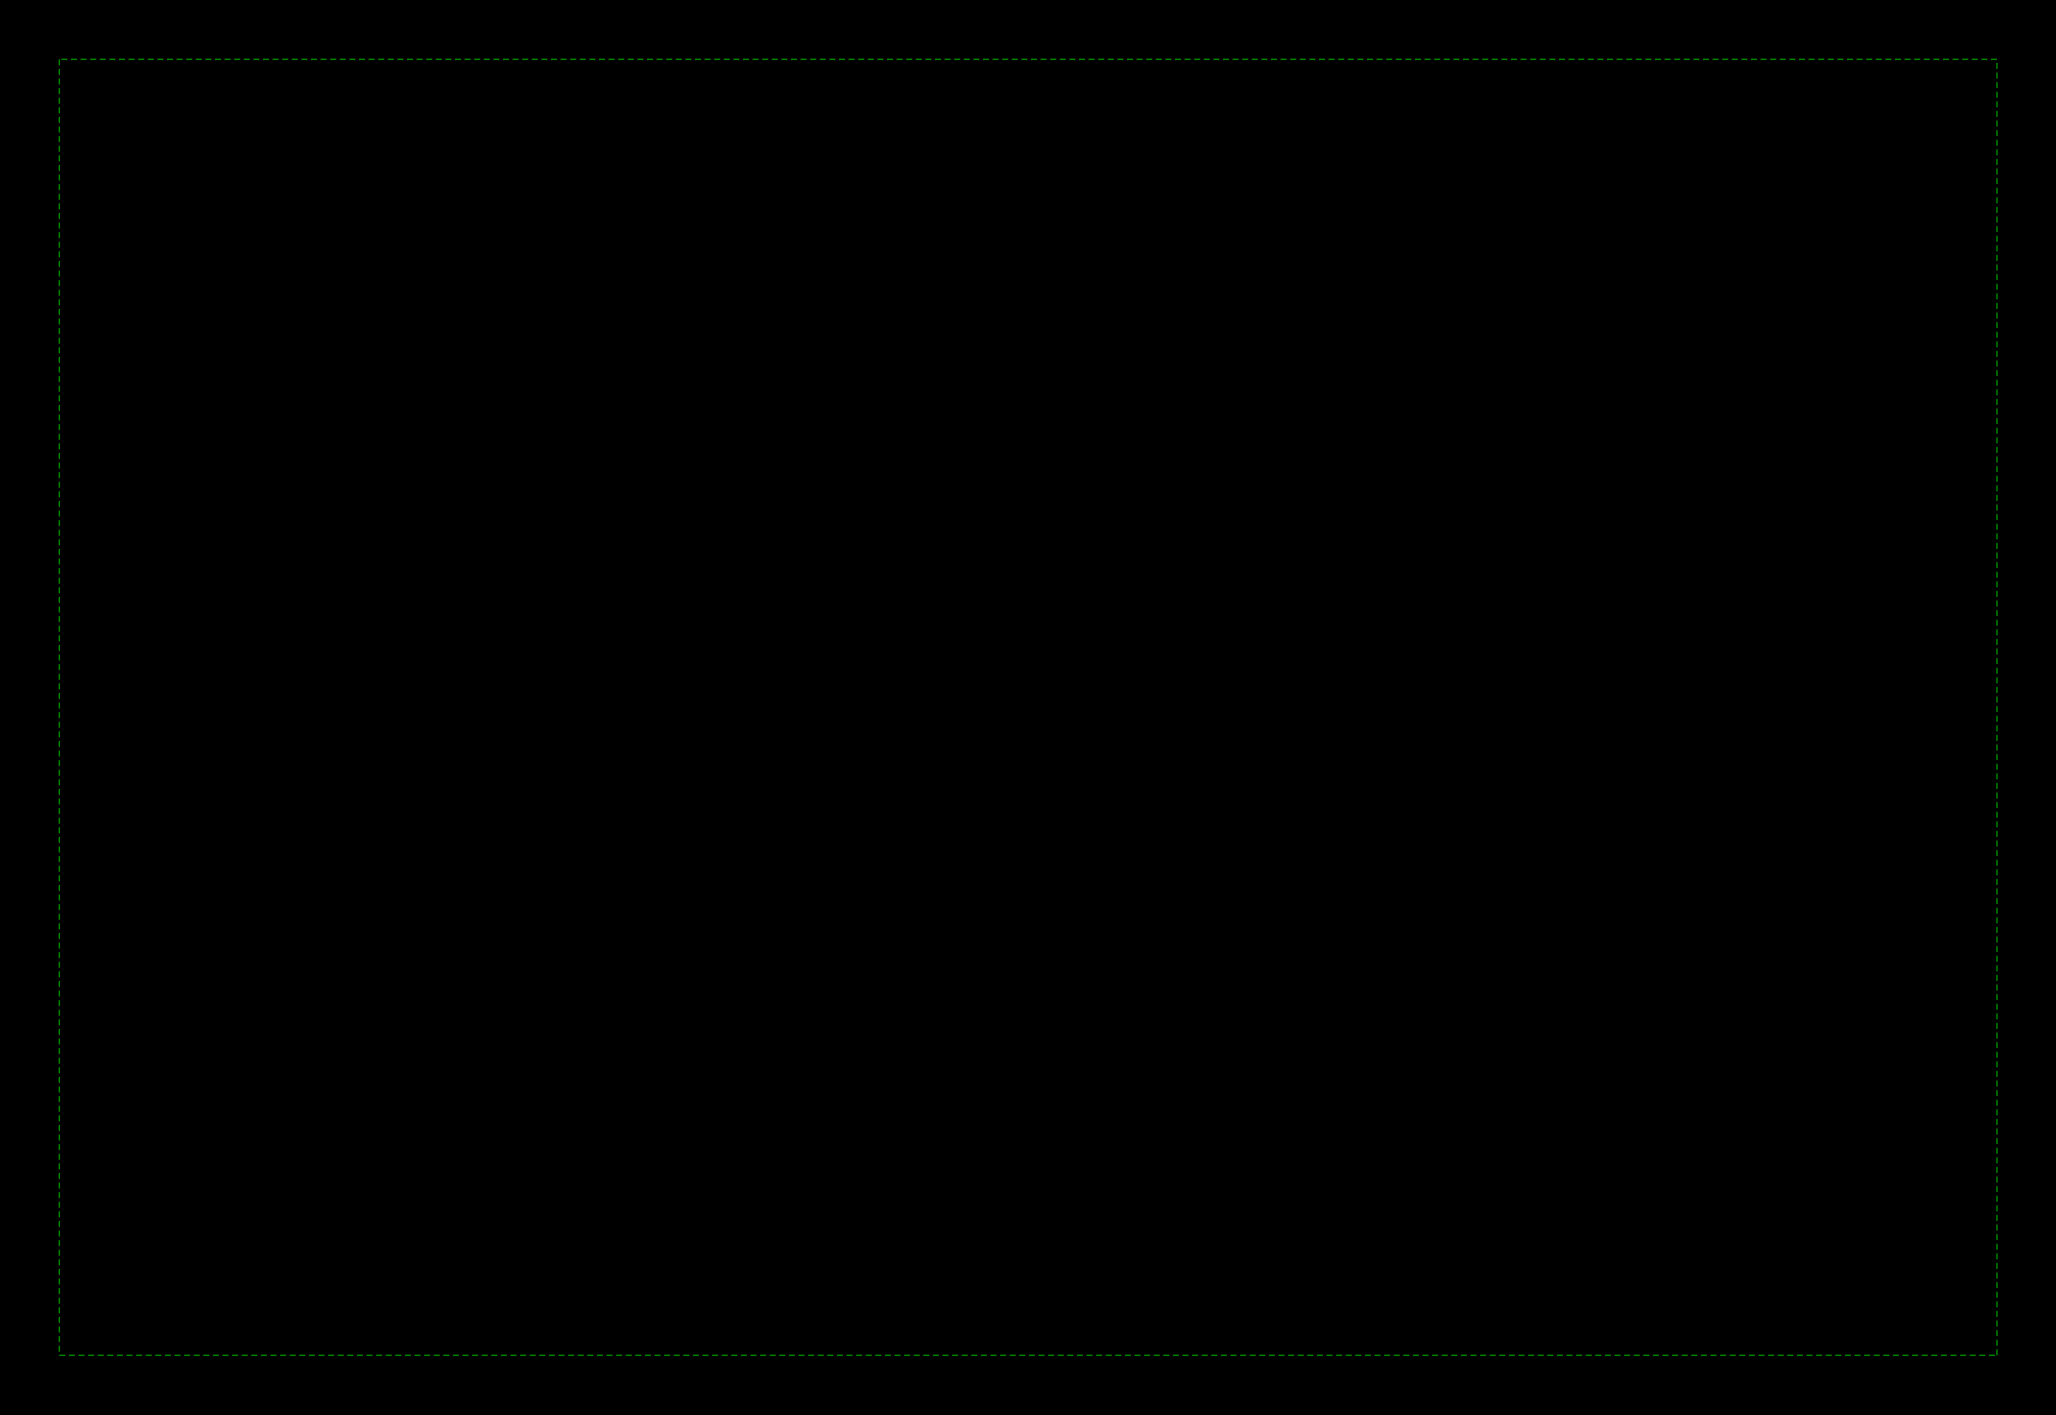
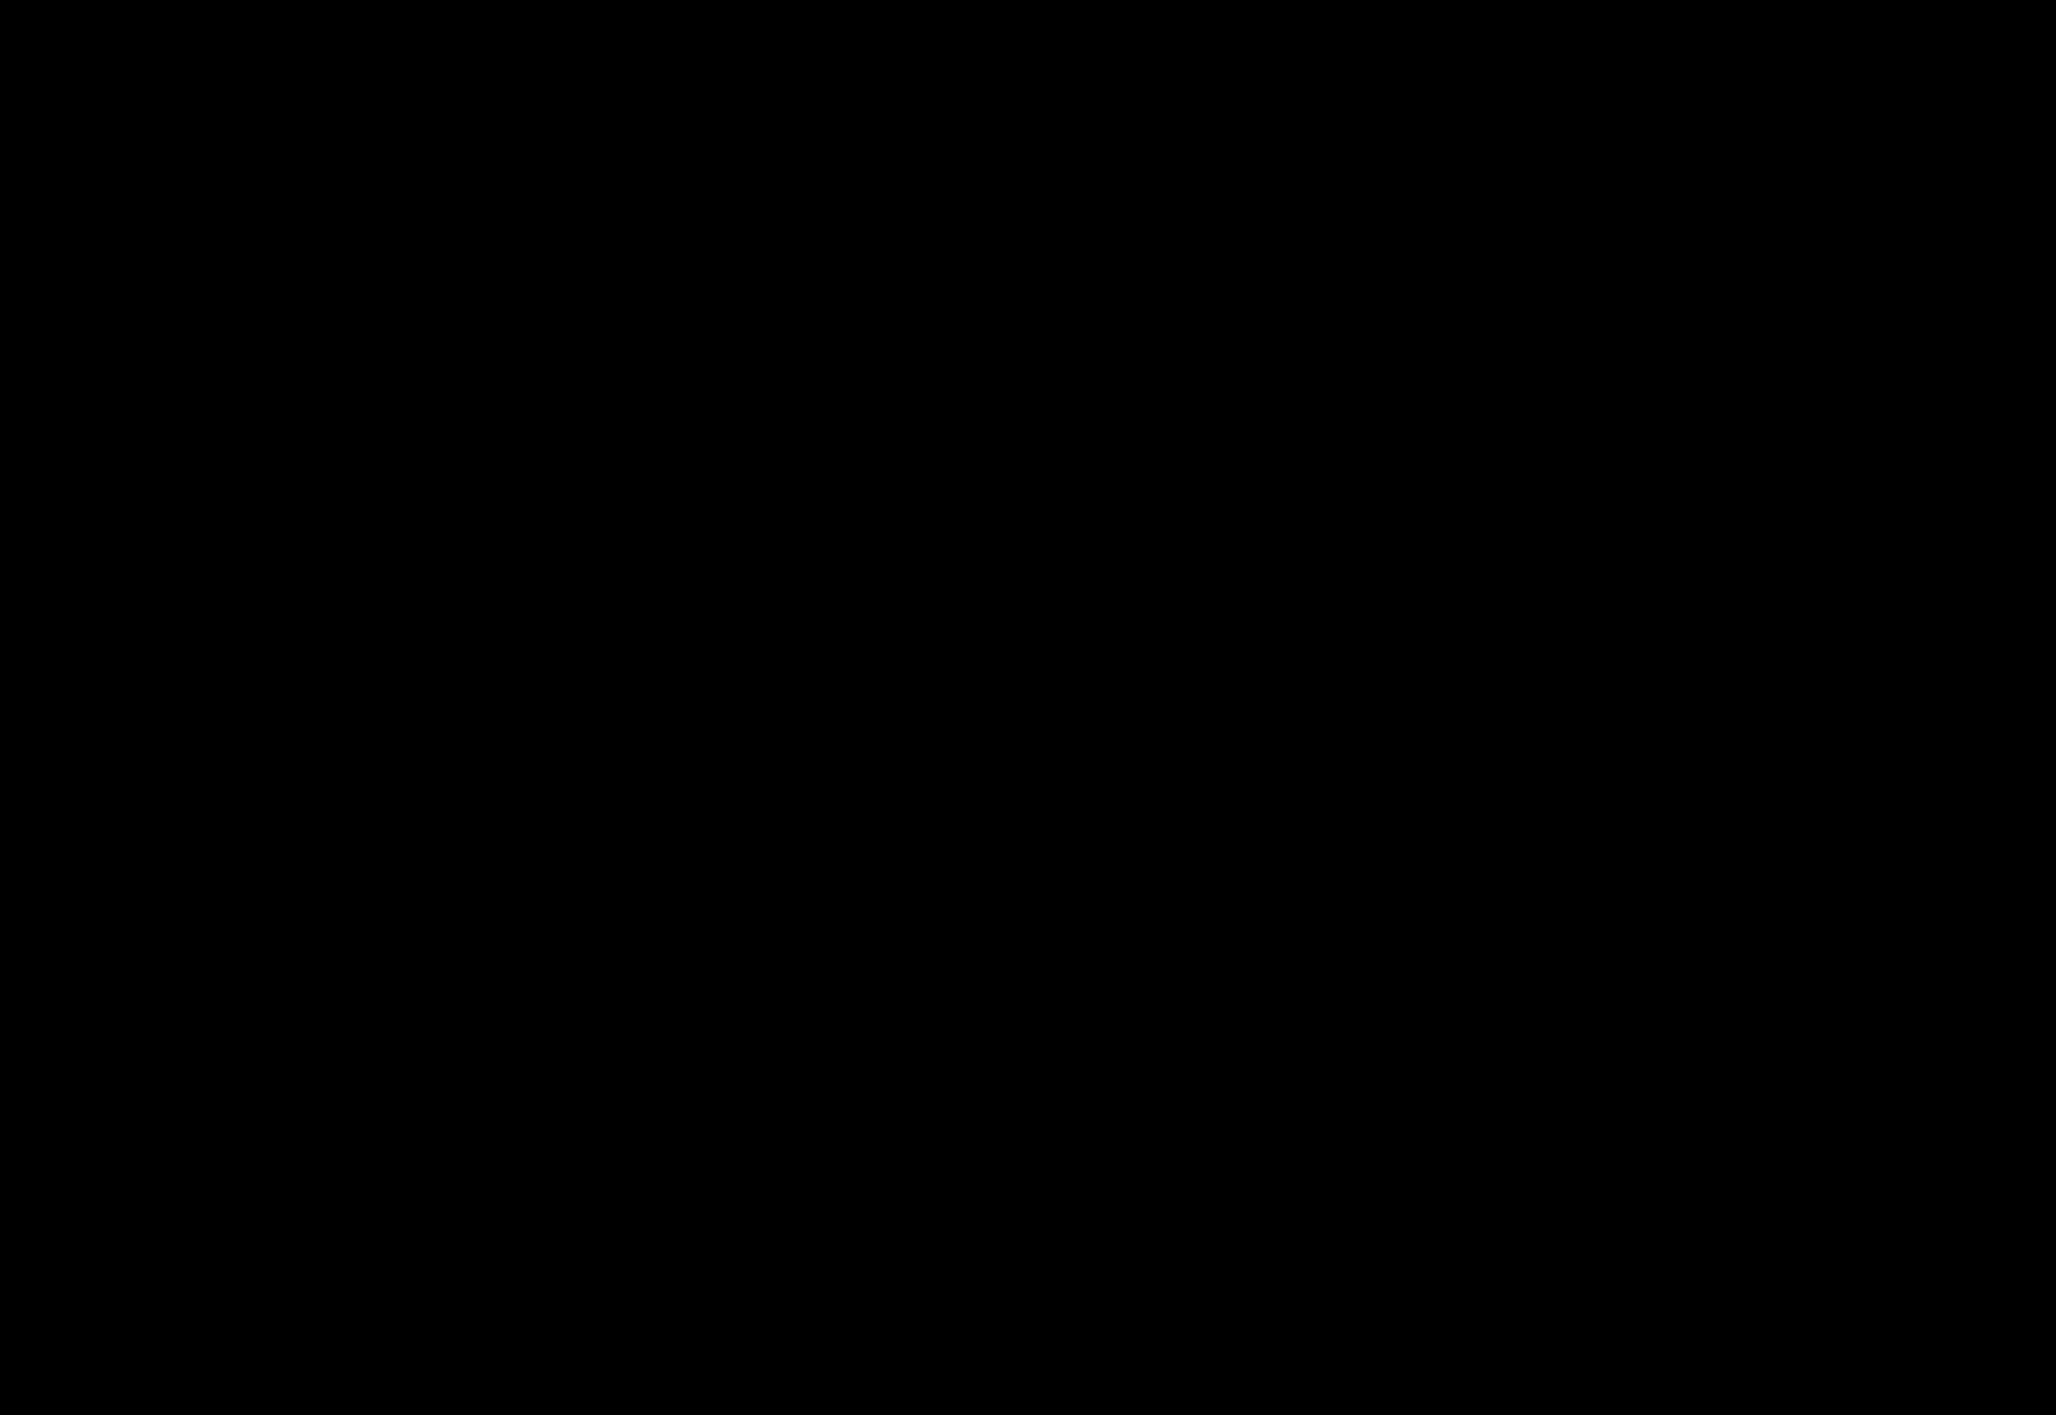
zone outline: (1996, 59) (59, 59) (59, 1355) (1996, 1355) (1996, 59) -> none

